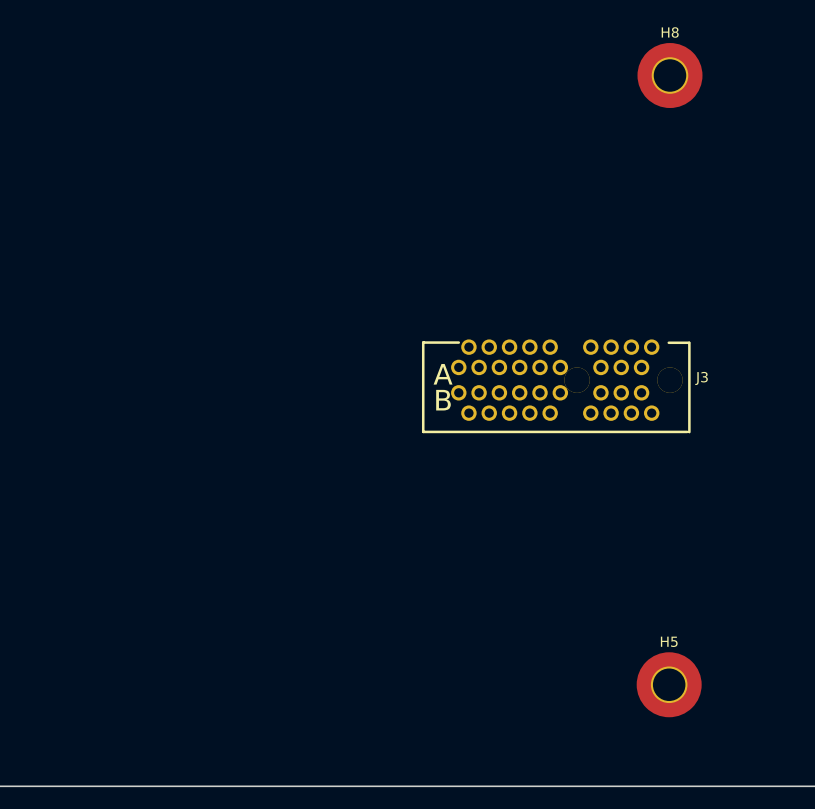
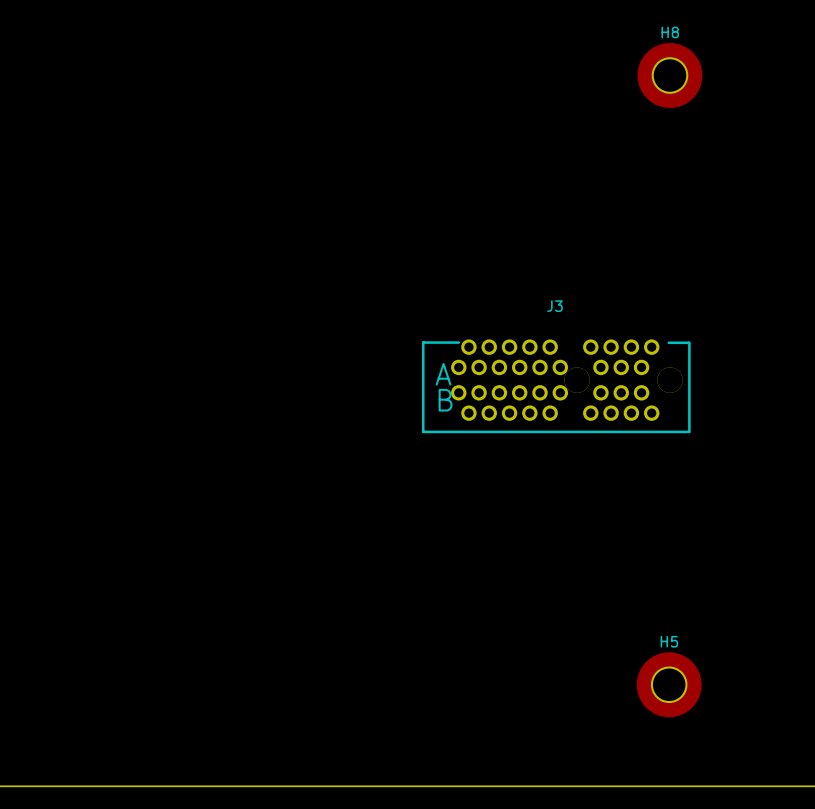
J3 name position: J3 (701, 378) -> J3 (555, 306)

